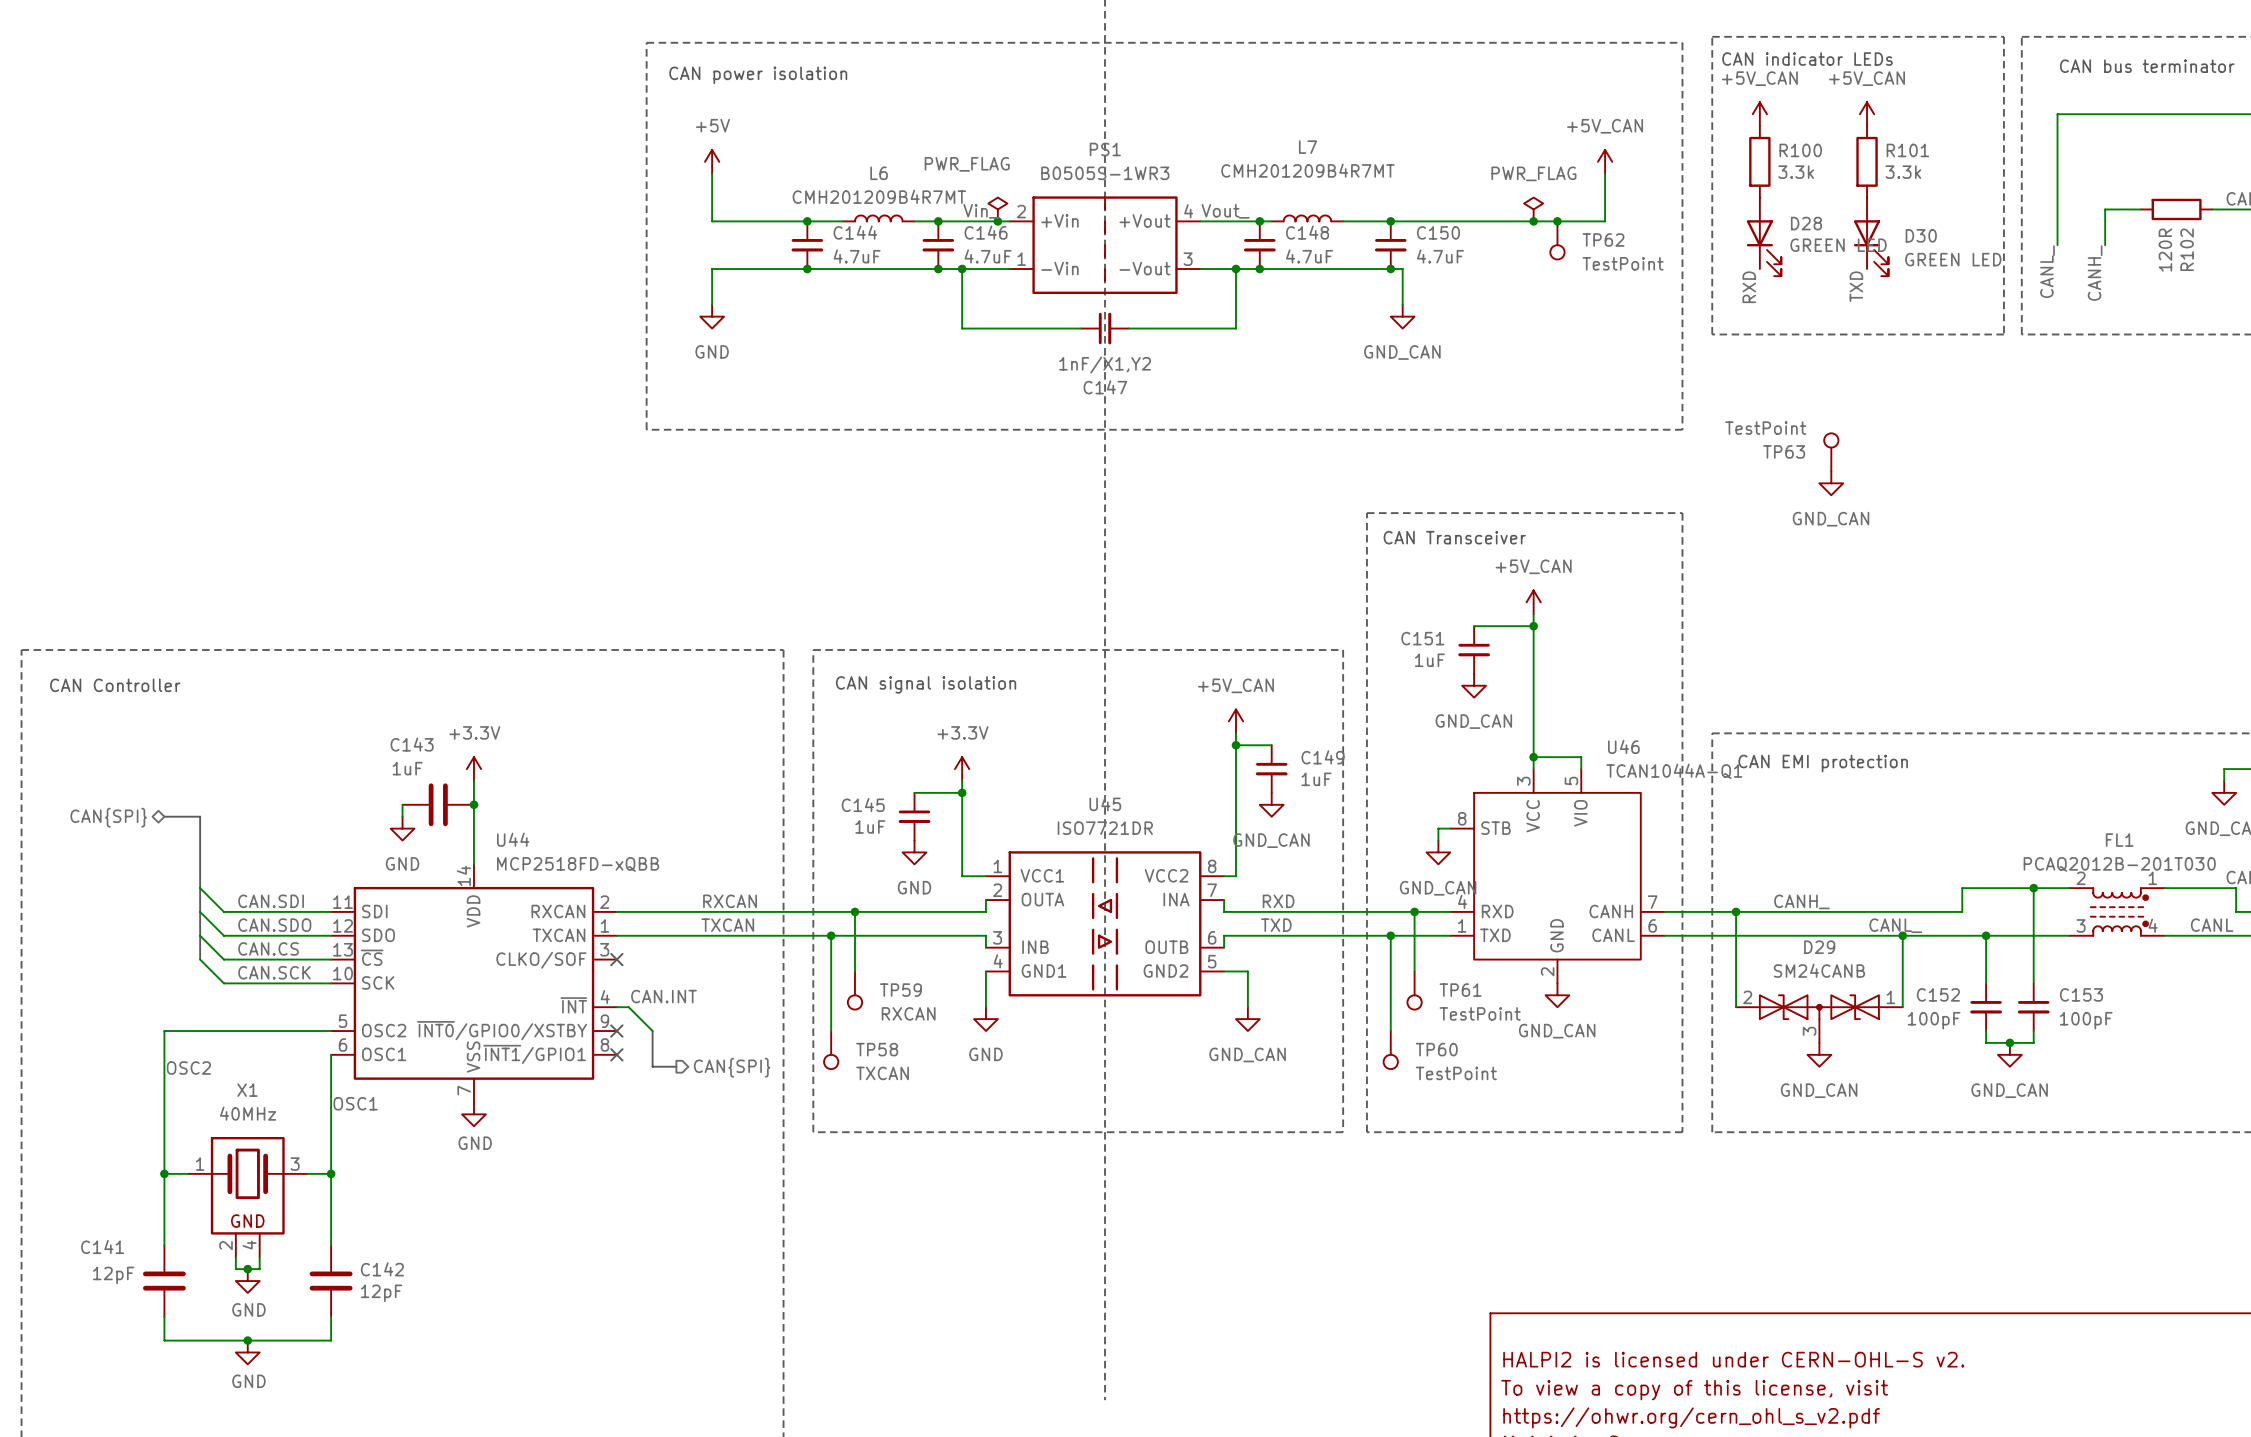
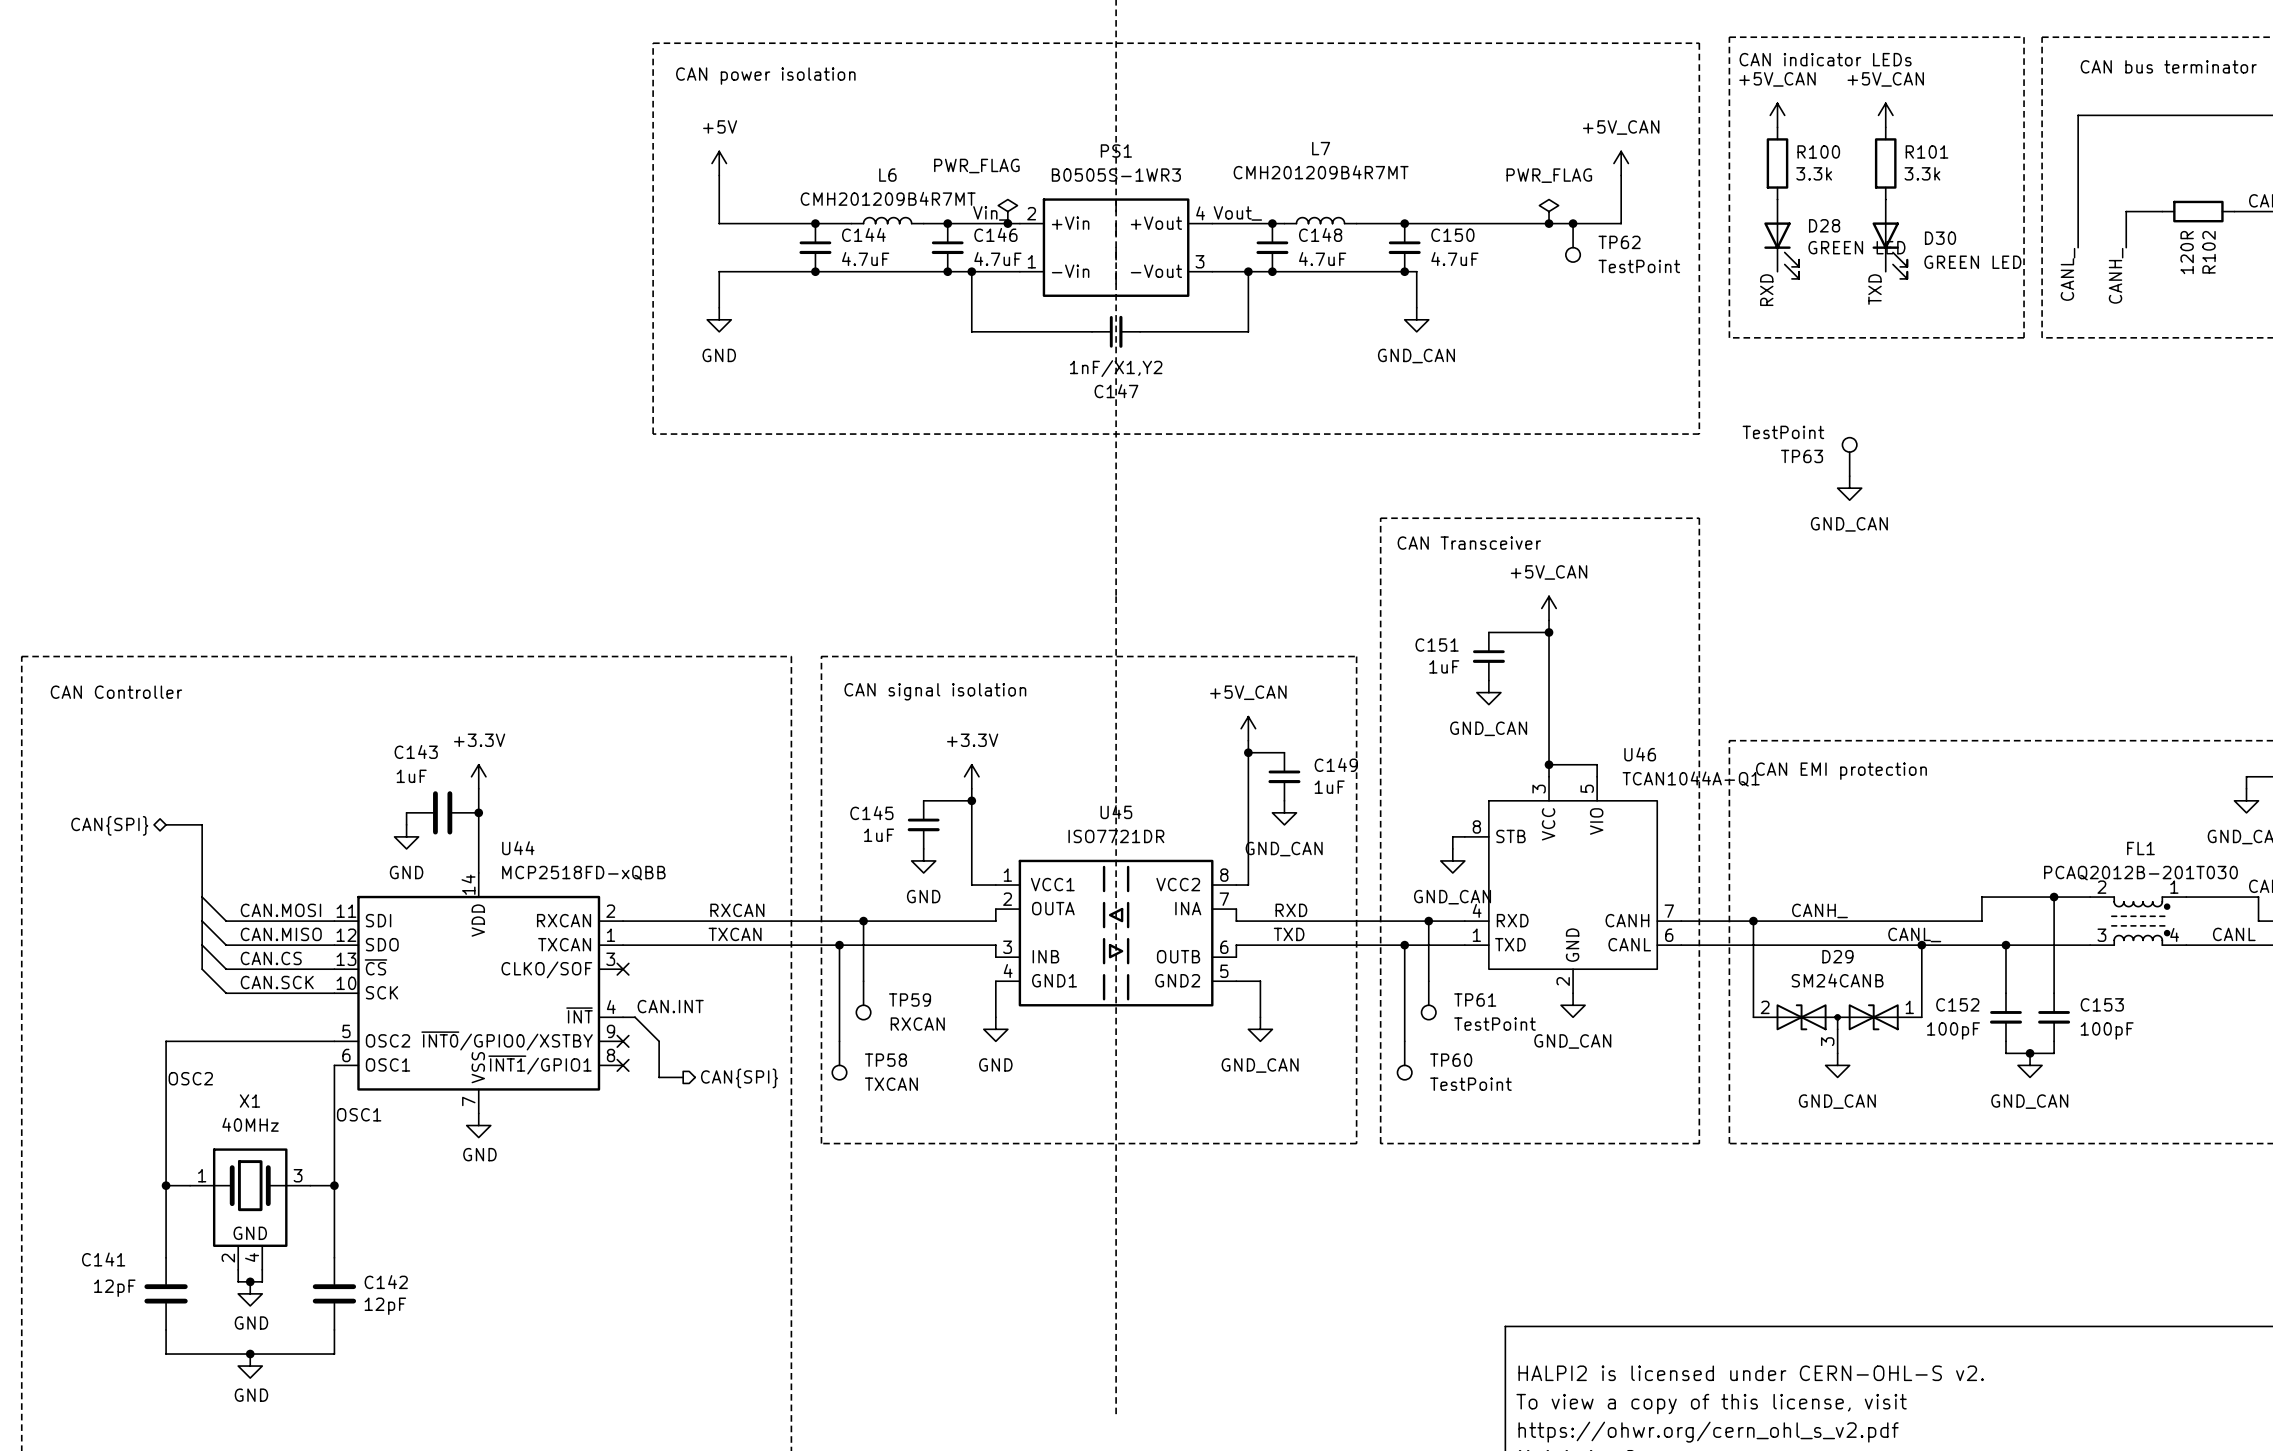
label: CAN.SDI (271, 901) -> CAN.MOSI (280, 910)
label: CAN.SDO (274, 925) -> CAN.MISO (281, 934)

